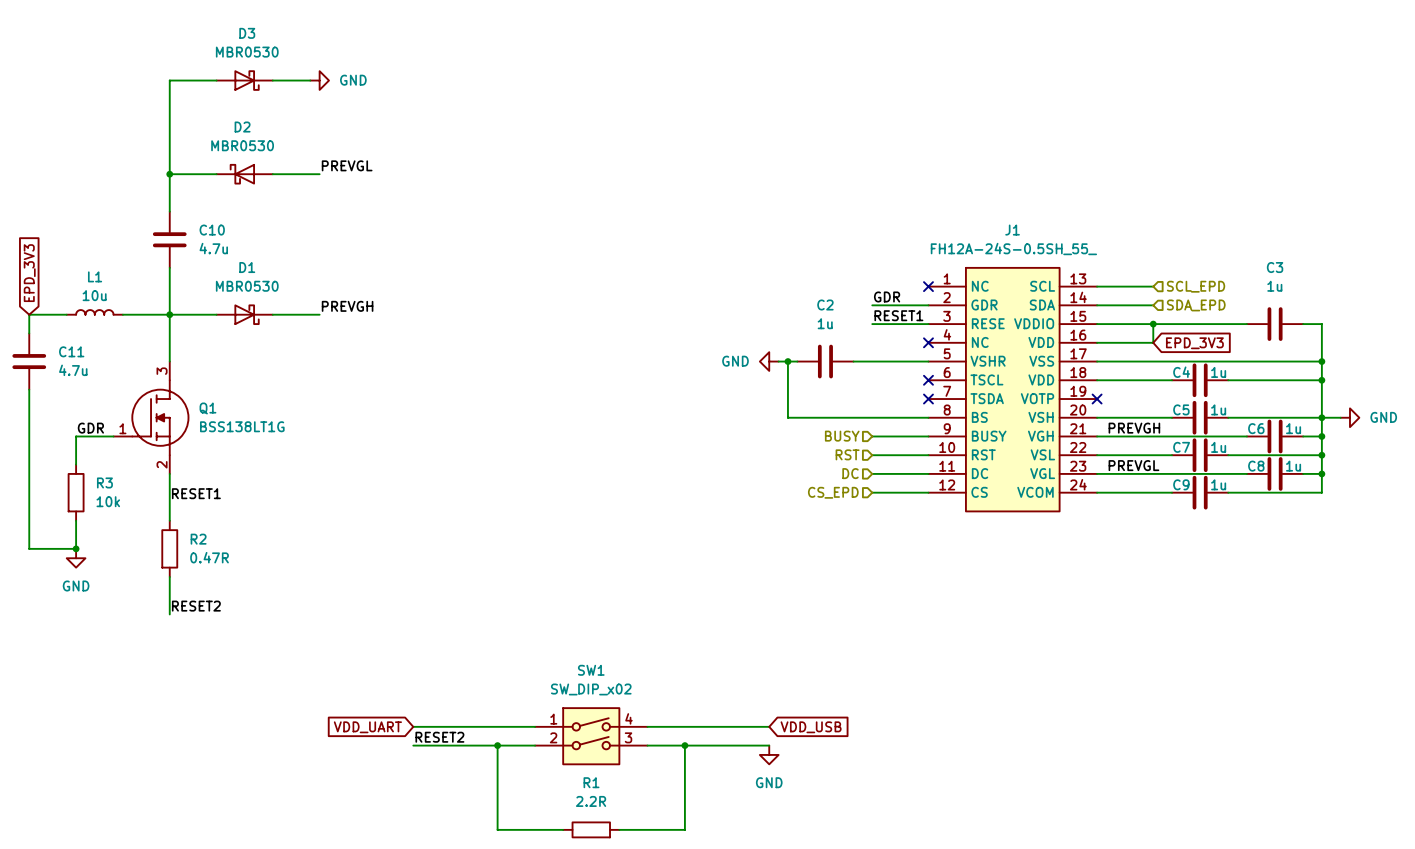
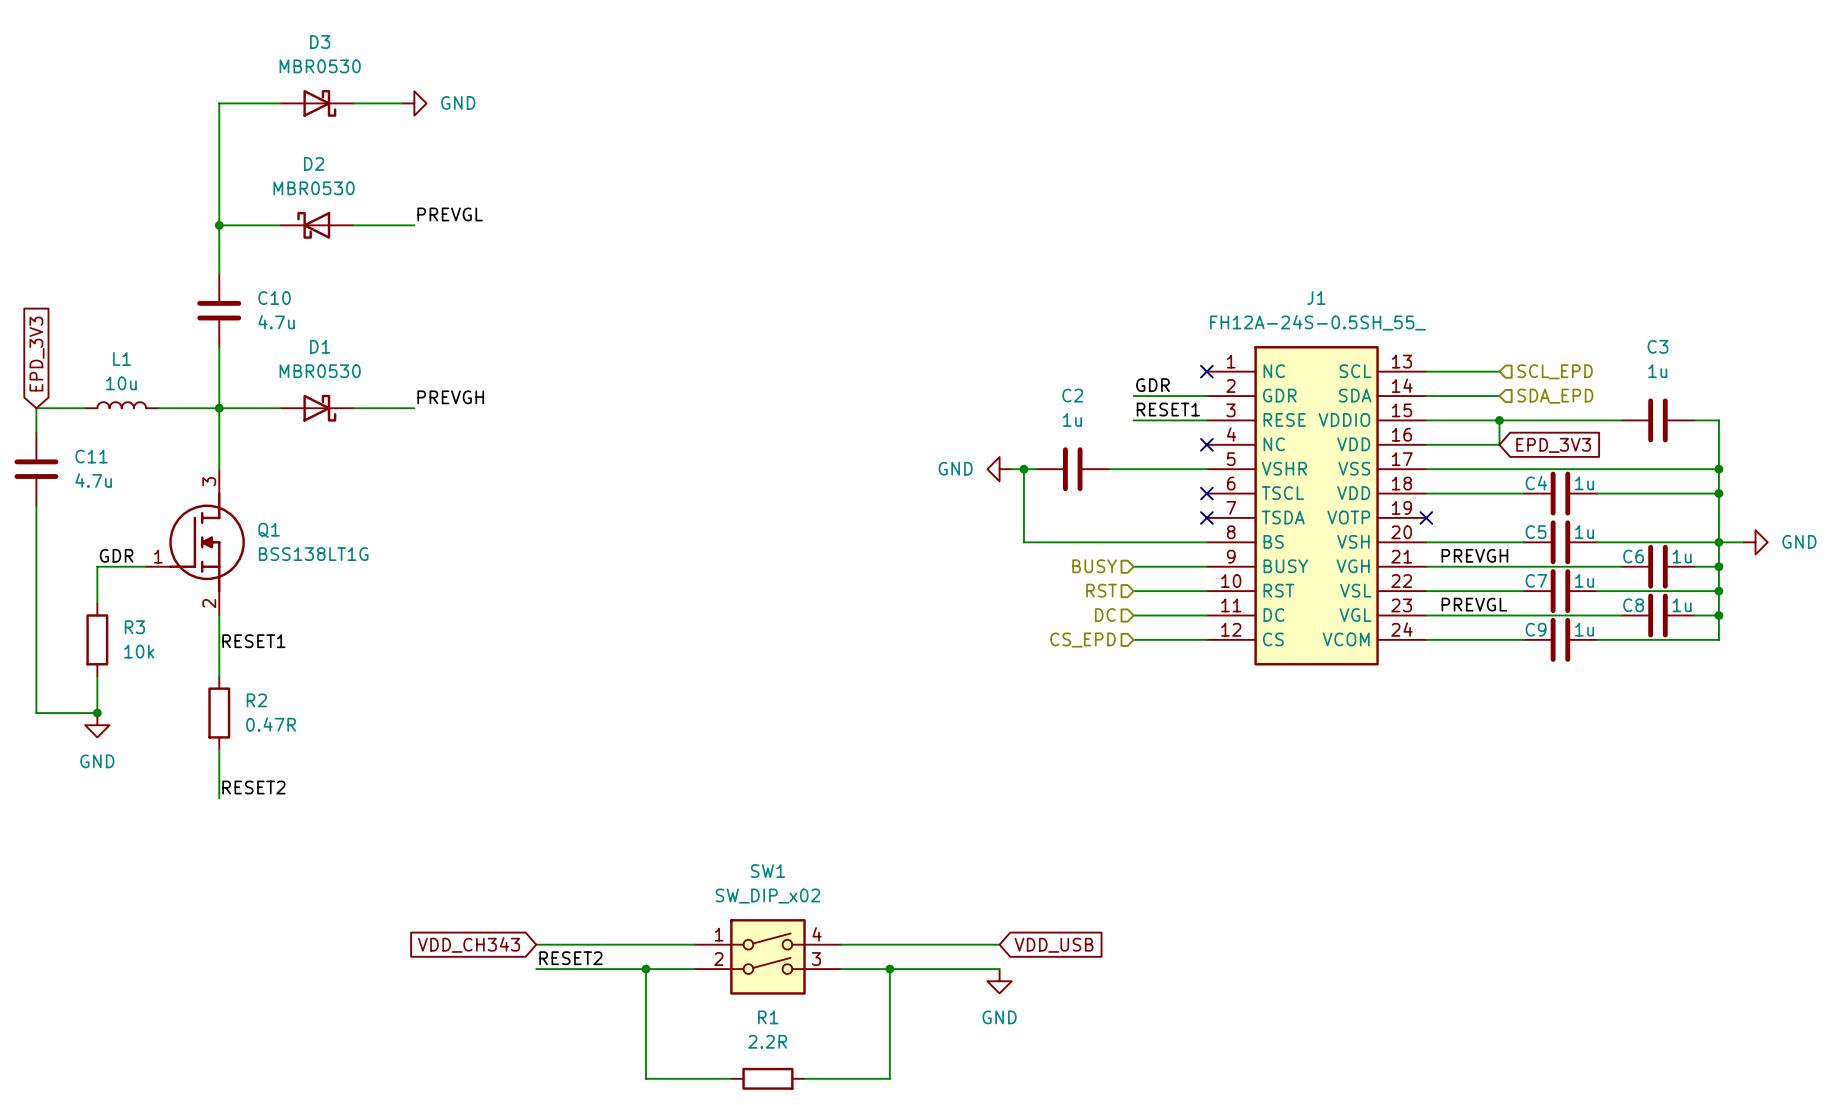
global label: VDD_UART (367, 727) -> VDD_CH343 (469, 944)

